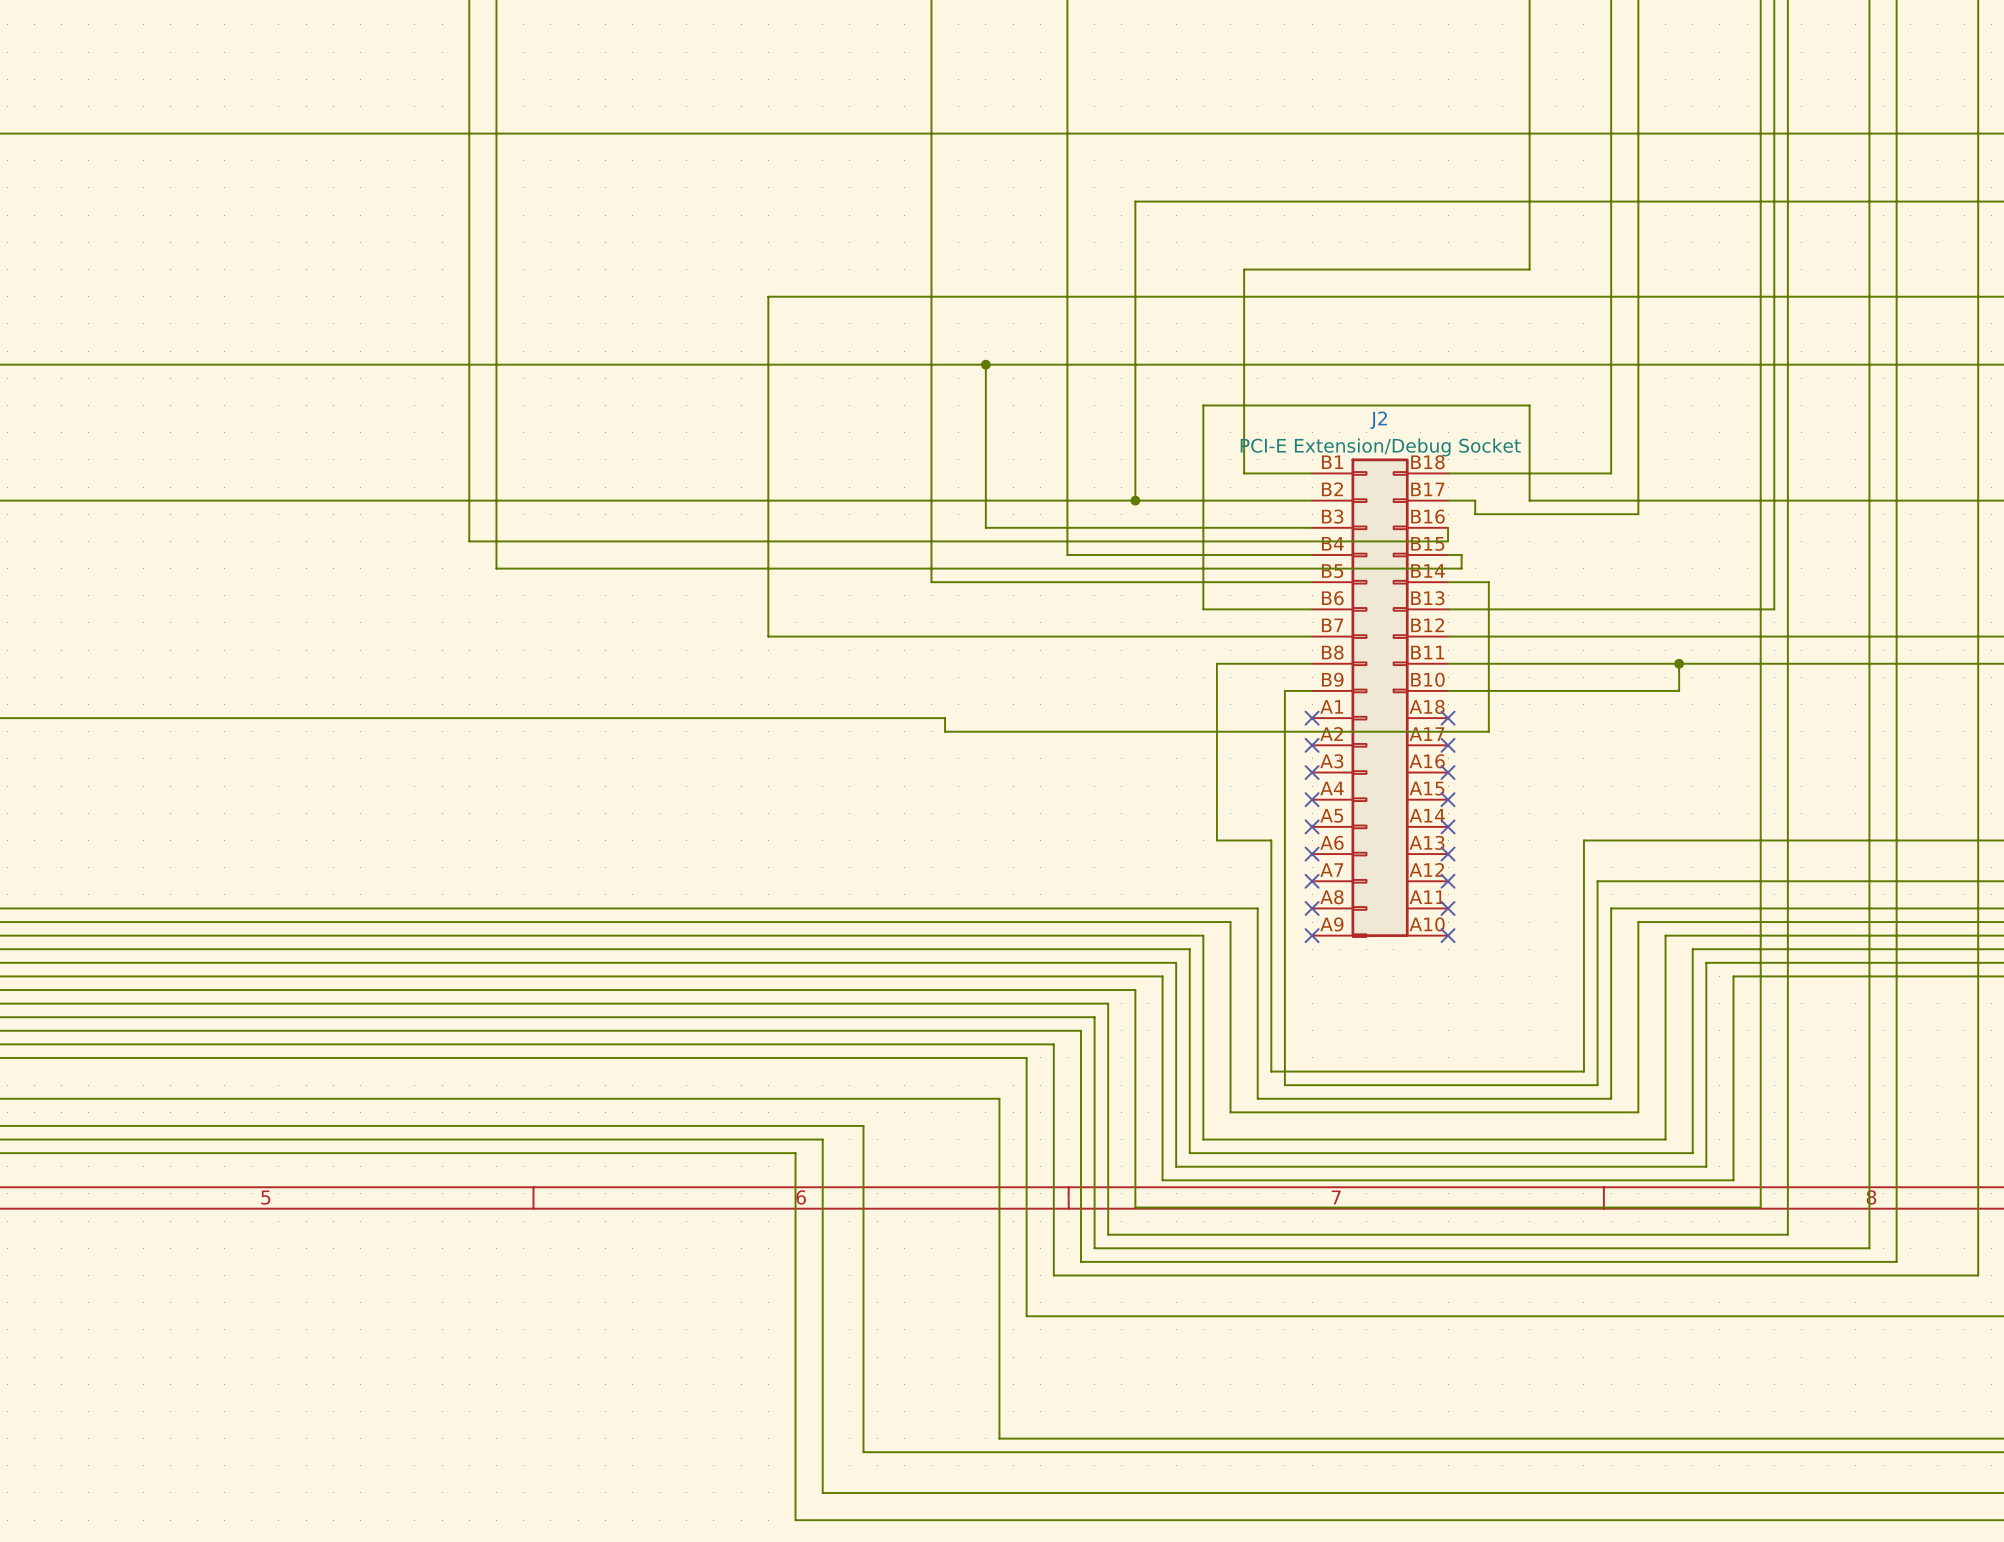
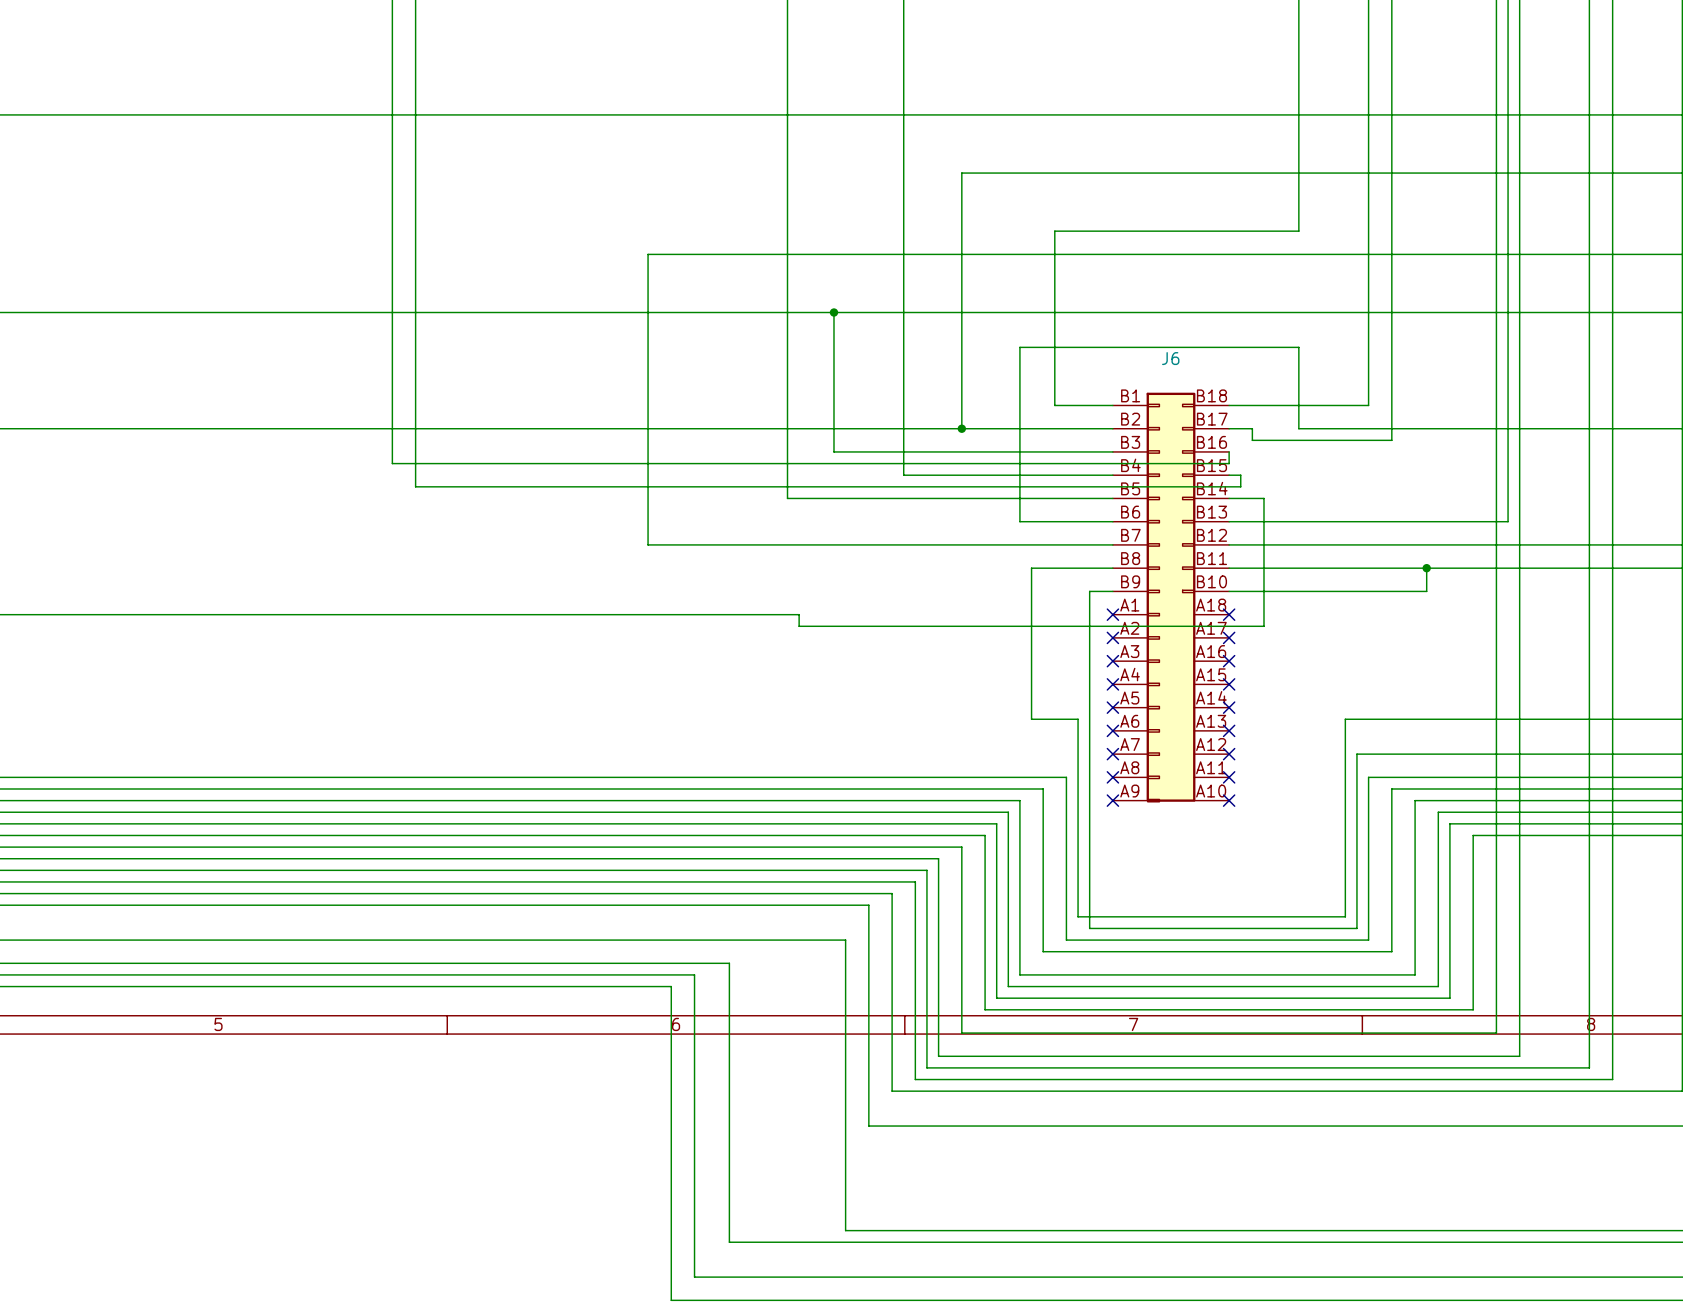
J2 name: J2 (1378, 420) -> J6 (1170, 358)
J2 value: PCI-E Extension/Debug Socket (1380, 447) -> none

